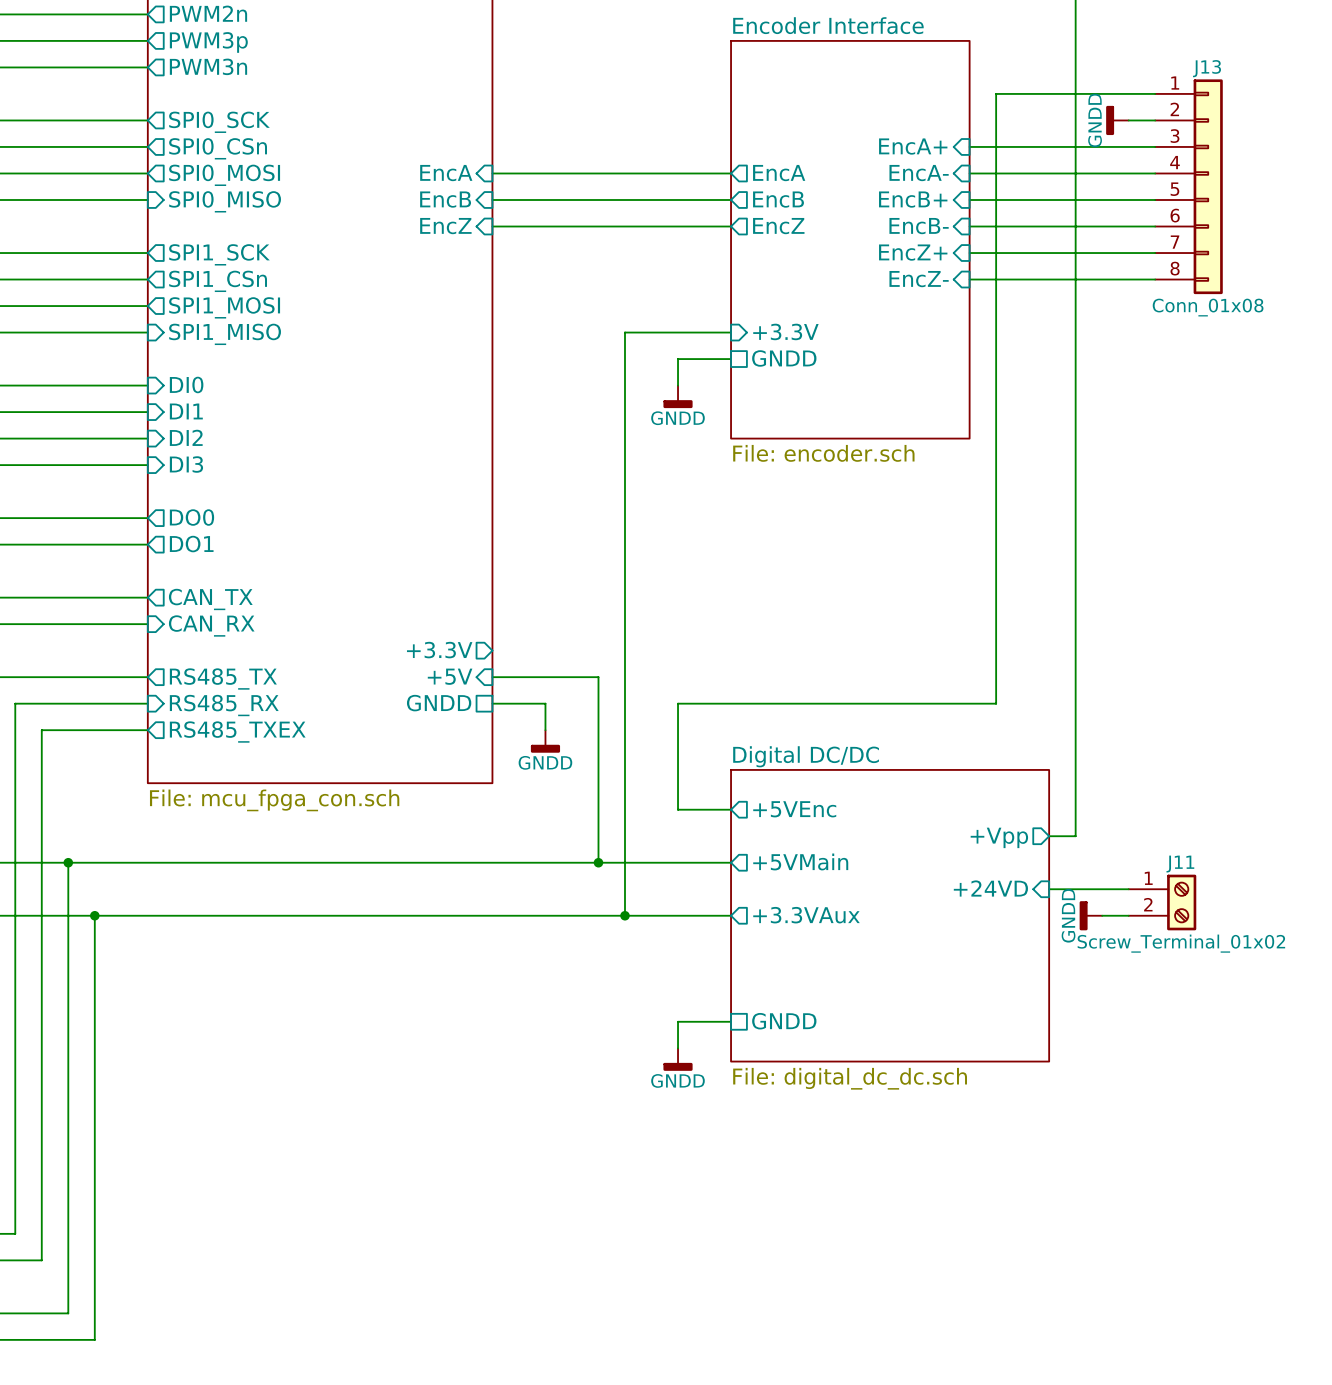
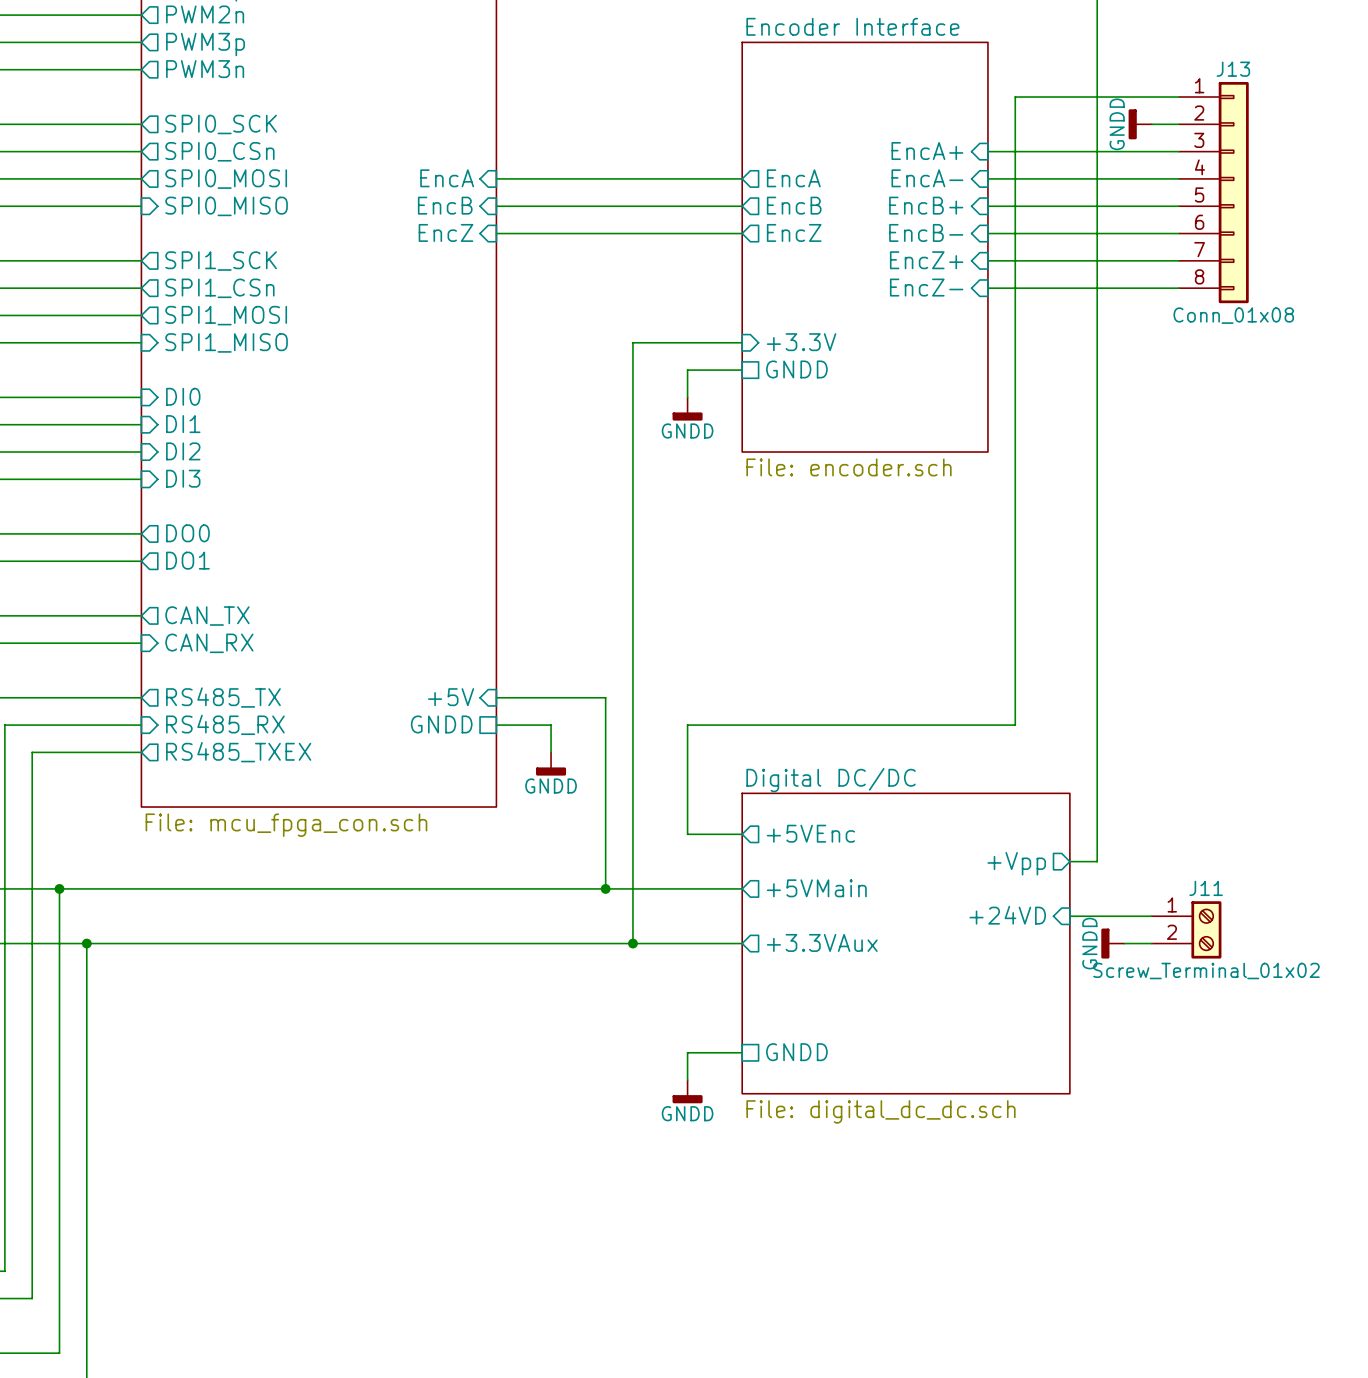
sheet pin: +3.3V (439, 650) -> none

